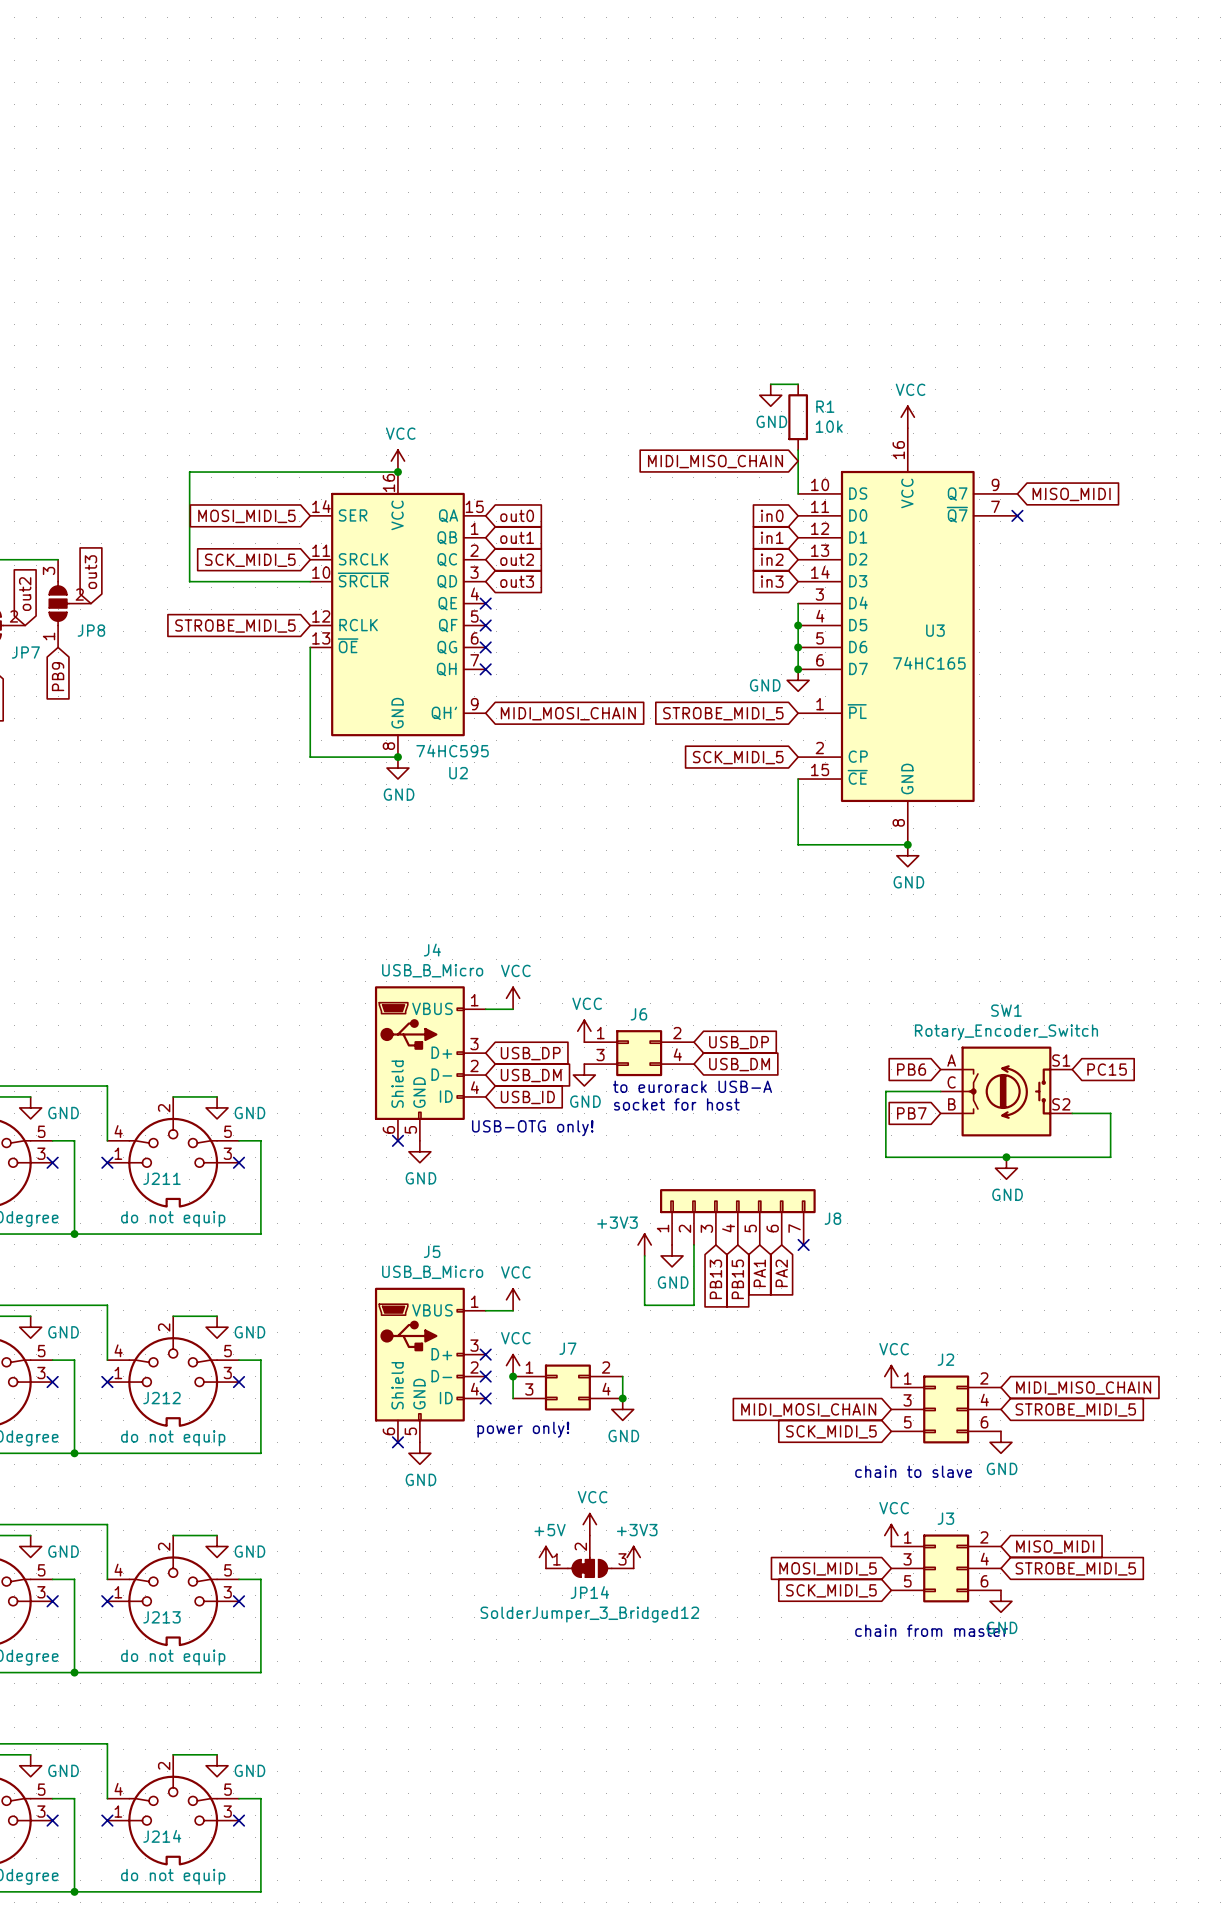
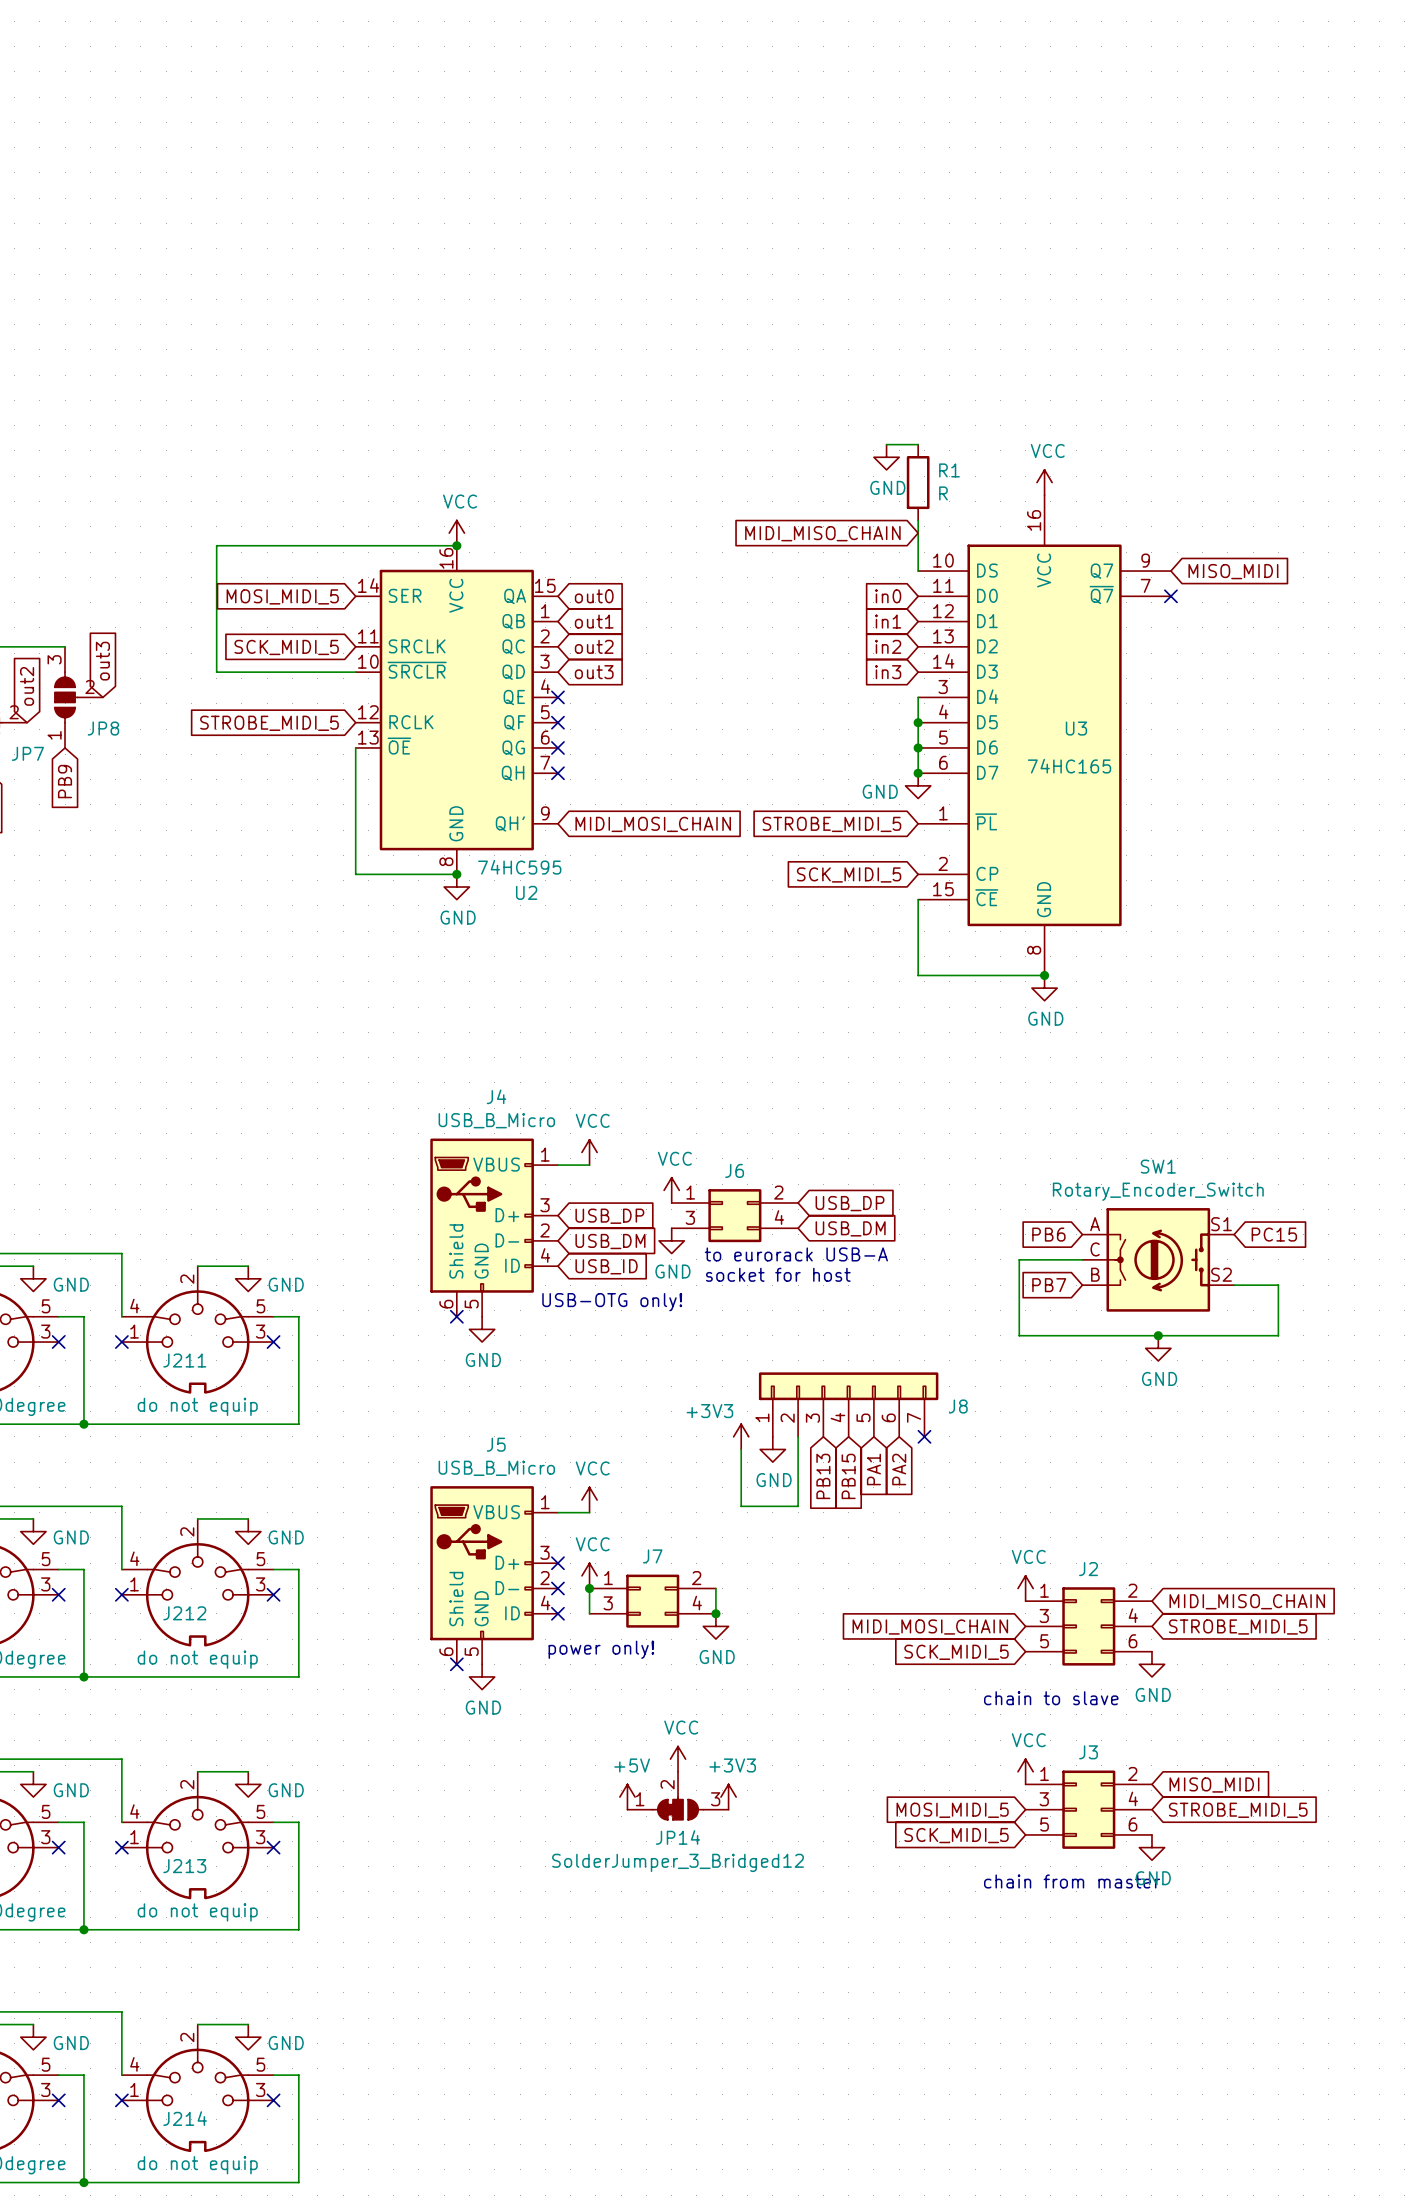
R1 value: 10k (829, 426) -> R (943, 493)

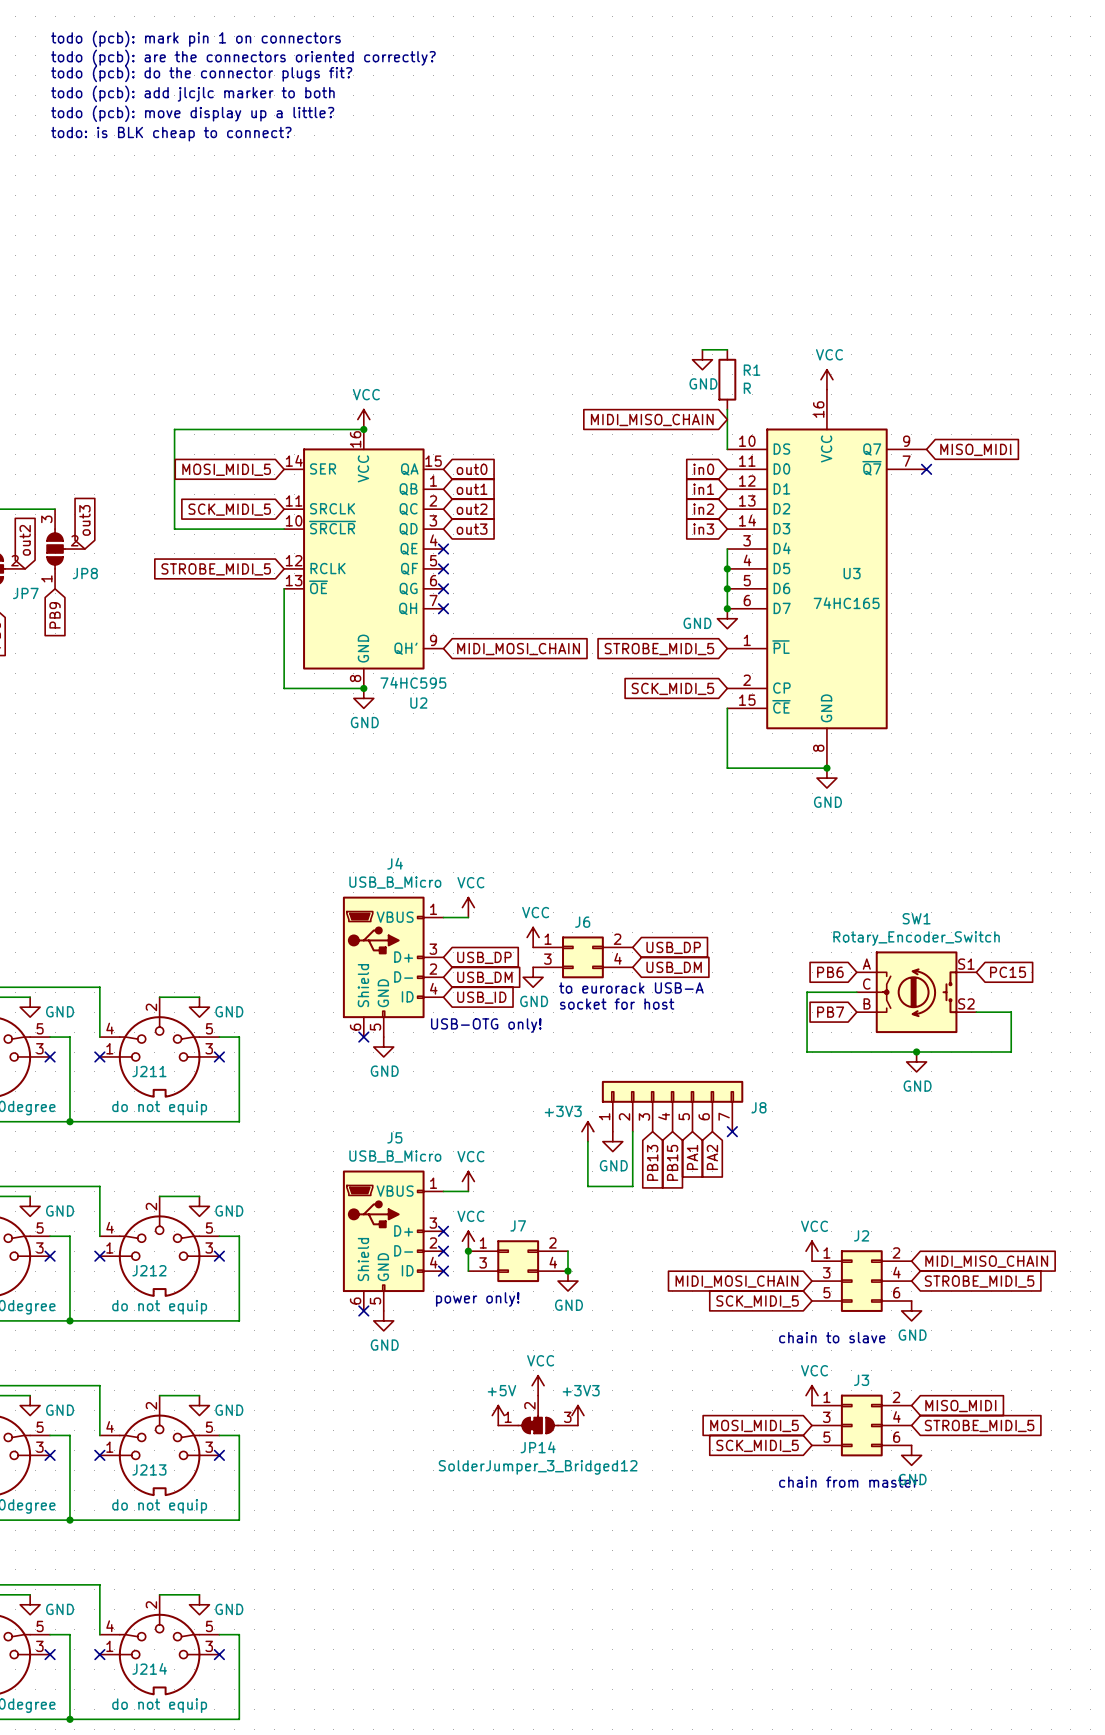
text: none -> todo (pcb): mark pin 1 on connectors (195, 39)
text: none -> todo (pcb): are the connectors oriented correctly? (243, 57)
text: none -> todo (pcb): do the connector plugs fit? (201, 73)
text: none -> todo (pcb): add jlcjlc marker to both (192, 93)
text: none -> todo (pcb): move display up a little? (192, 113)
text: none -> todo: is BLK cheap to connect? (171, 134)

